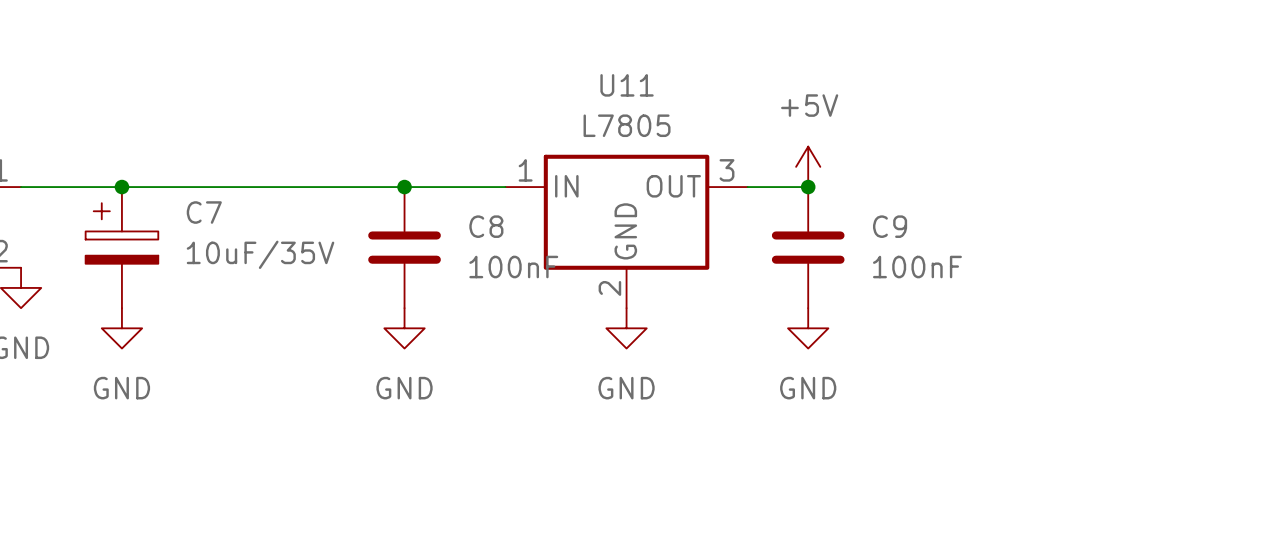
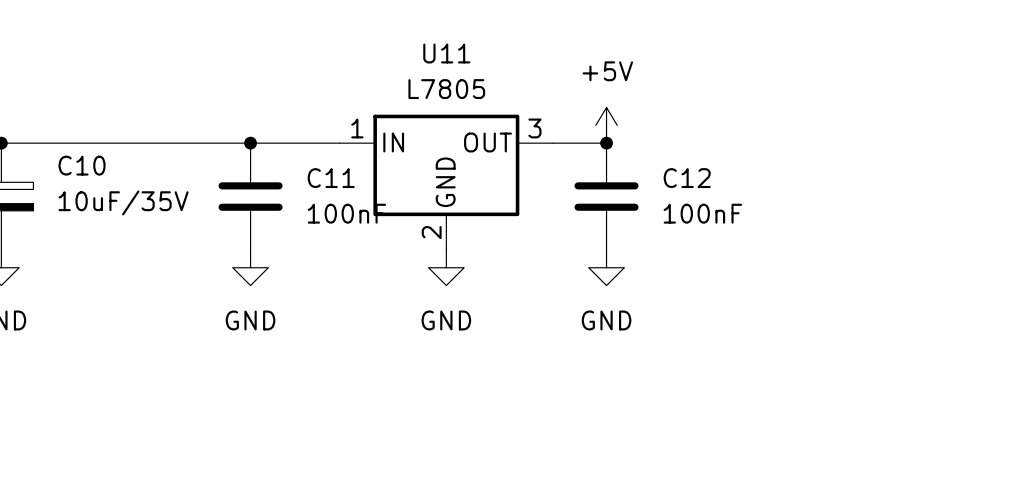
C7 name: C7 (204, 212) -> C10 (82, 165)
C8 name: C8 (486, 226) -> C11 (331, 178)
C9 name: C9 (890, 226) -> C12 (687, 178)

